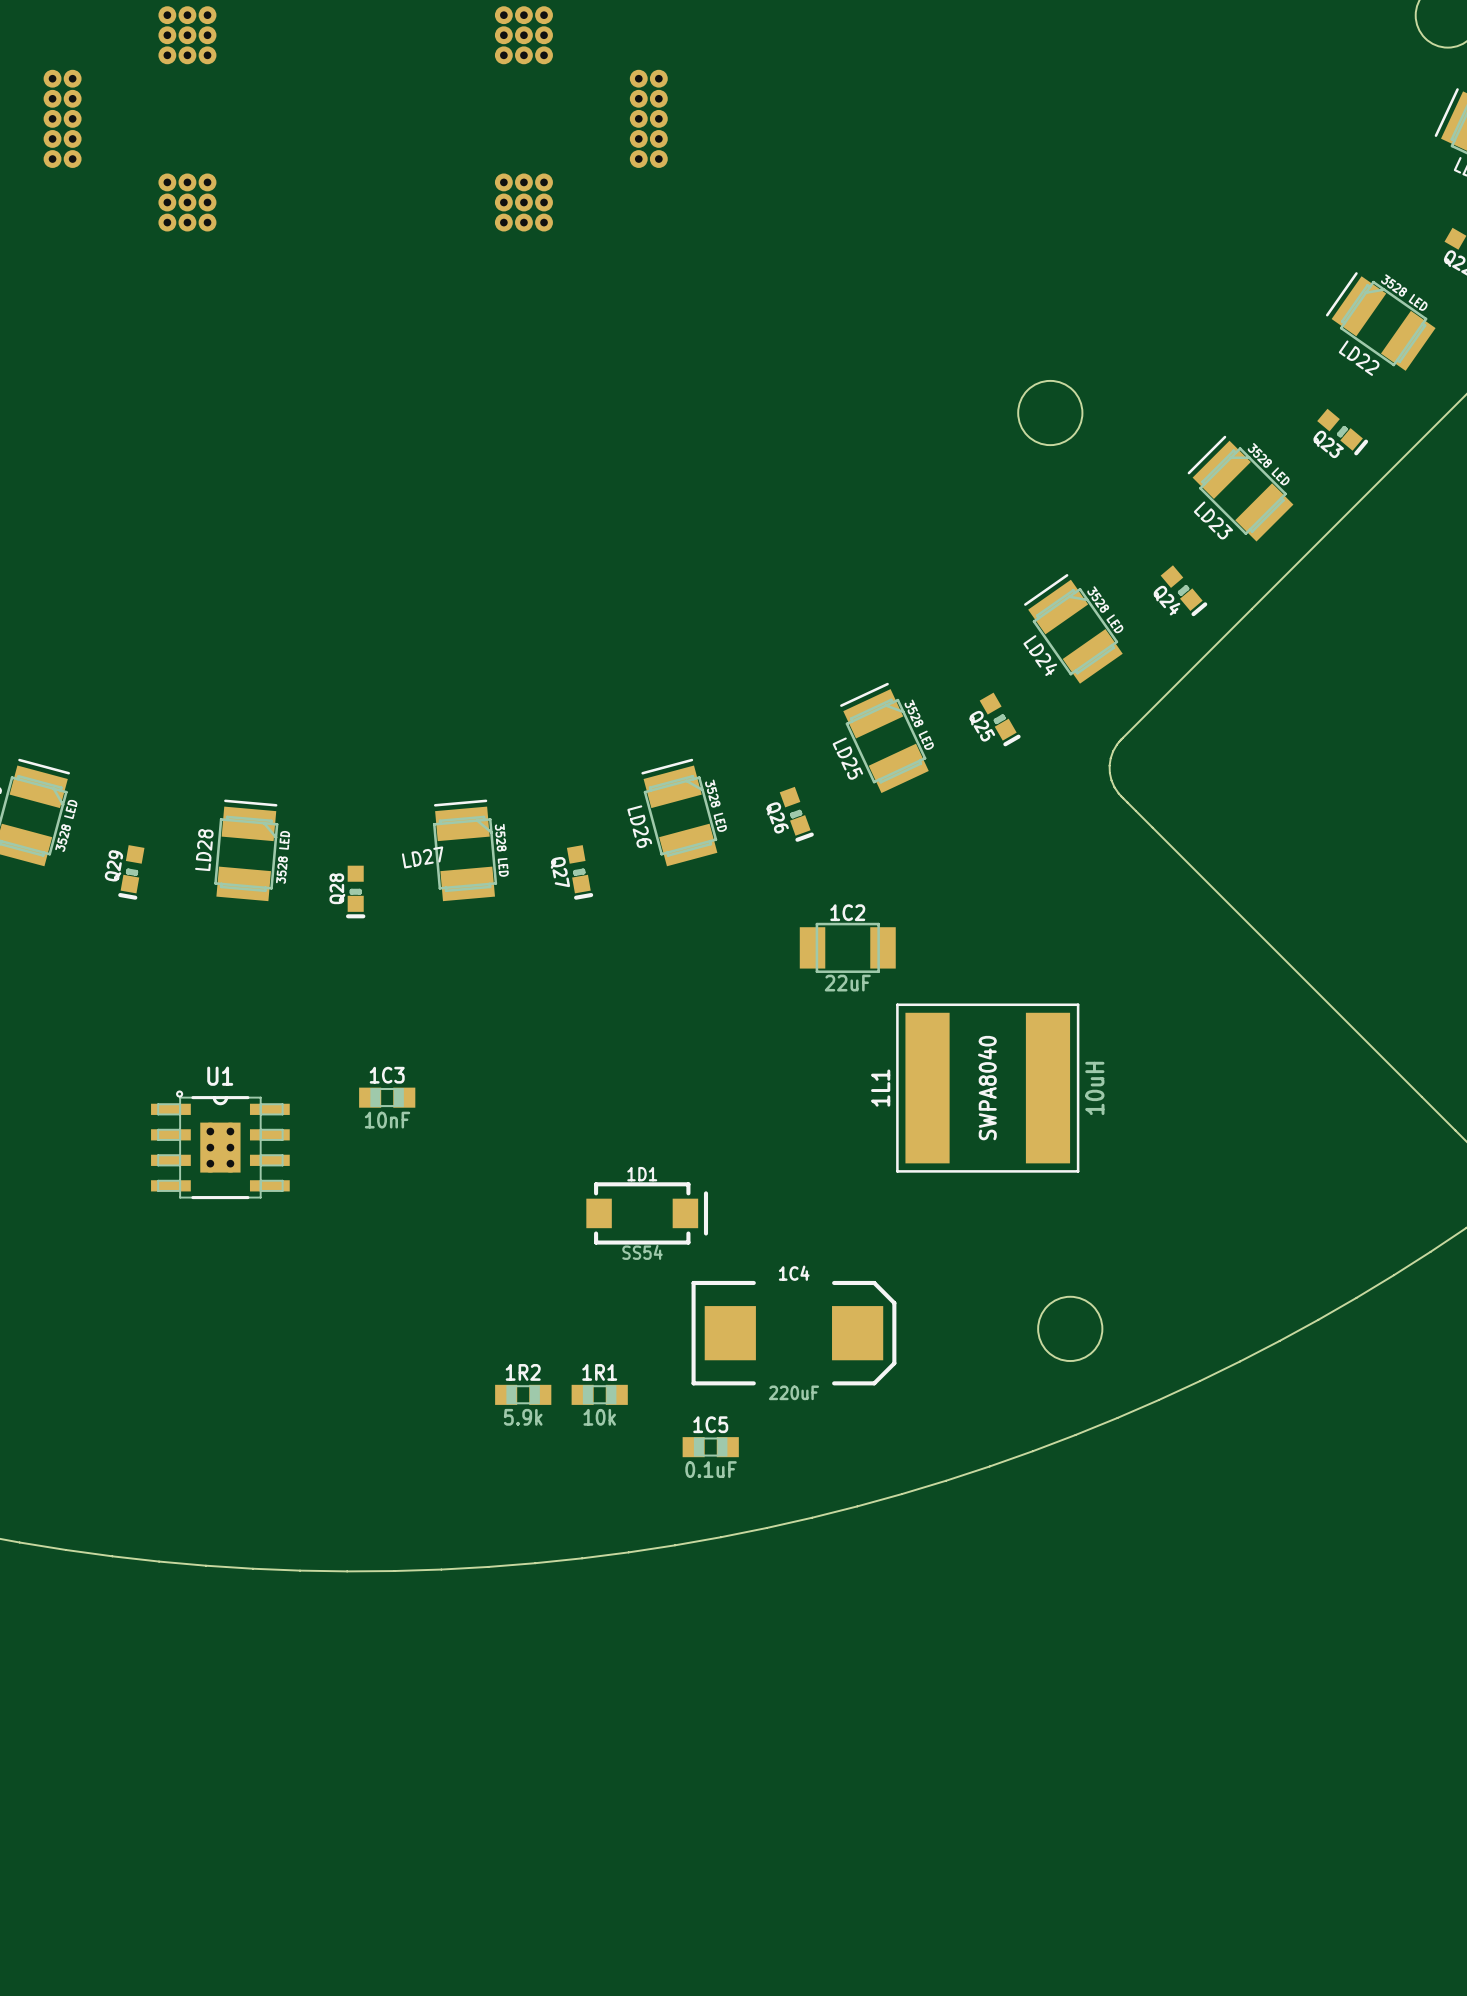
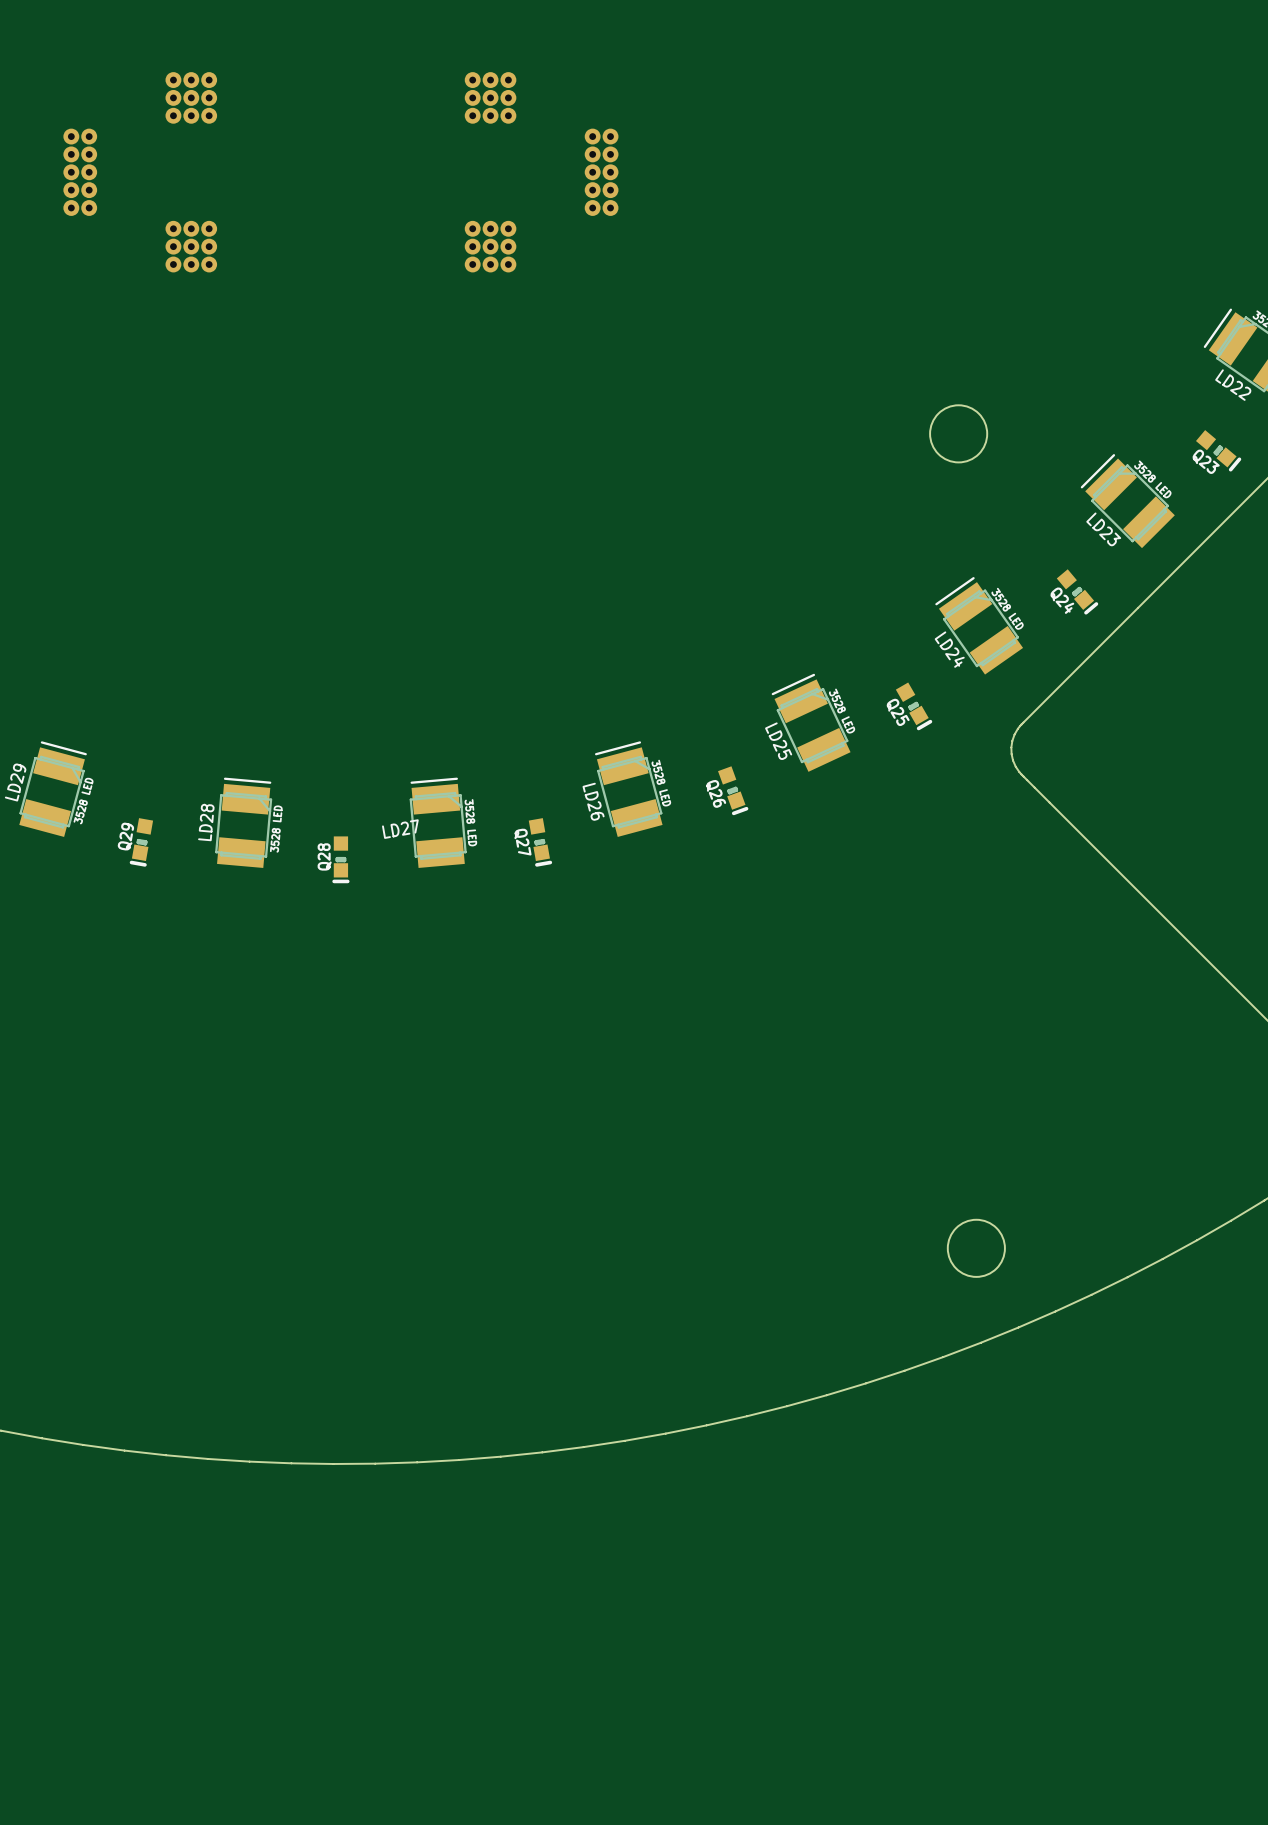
1C2: 22uF (847, 947) -> none
1L1: 10uH (987, 1088) -> none
1C3: 10nF (387, 1097) -> none
U1: (220, 1144) -> none
1D1: SS54 (647, 1213) -> none
1C4: 220uF (793, 1333) -> none
1R2: 5.9k (523, 1394) -> none
1R1: 10k (599, 1394) -> none
1C5: 0.1uF (710, 1447) -> none

